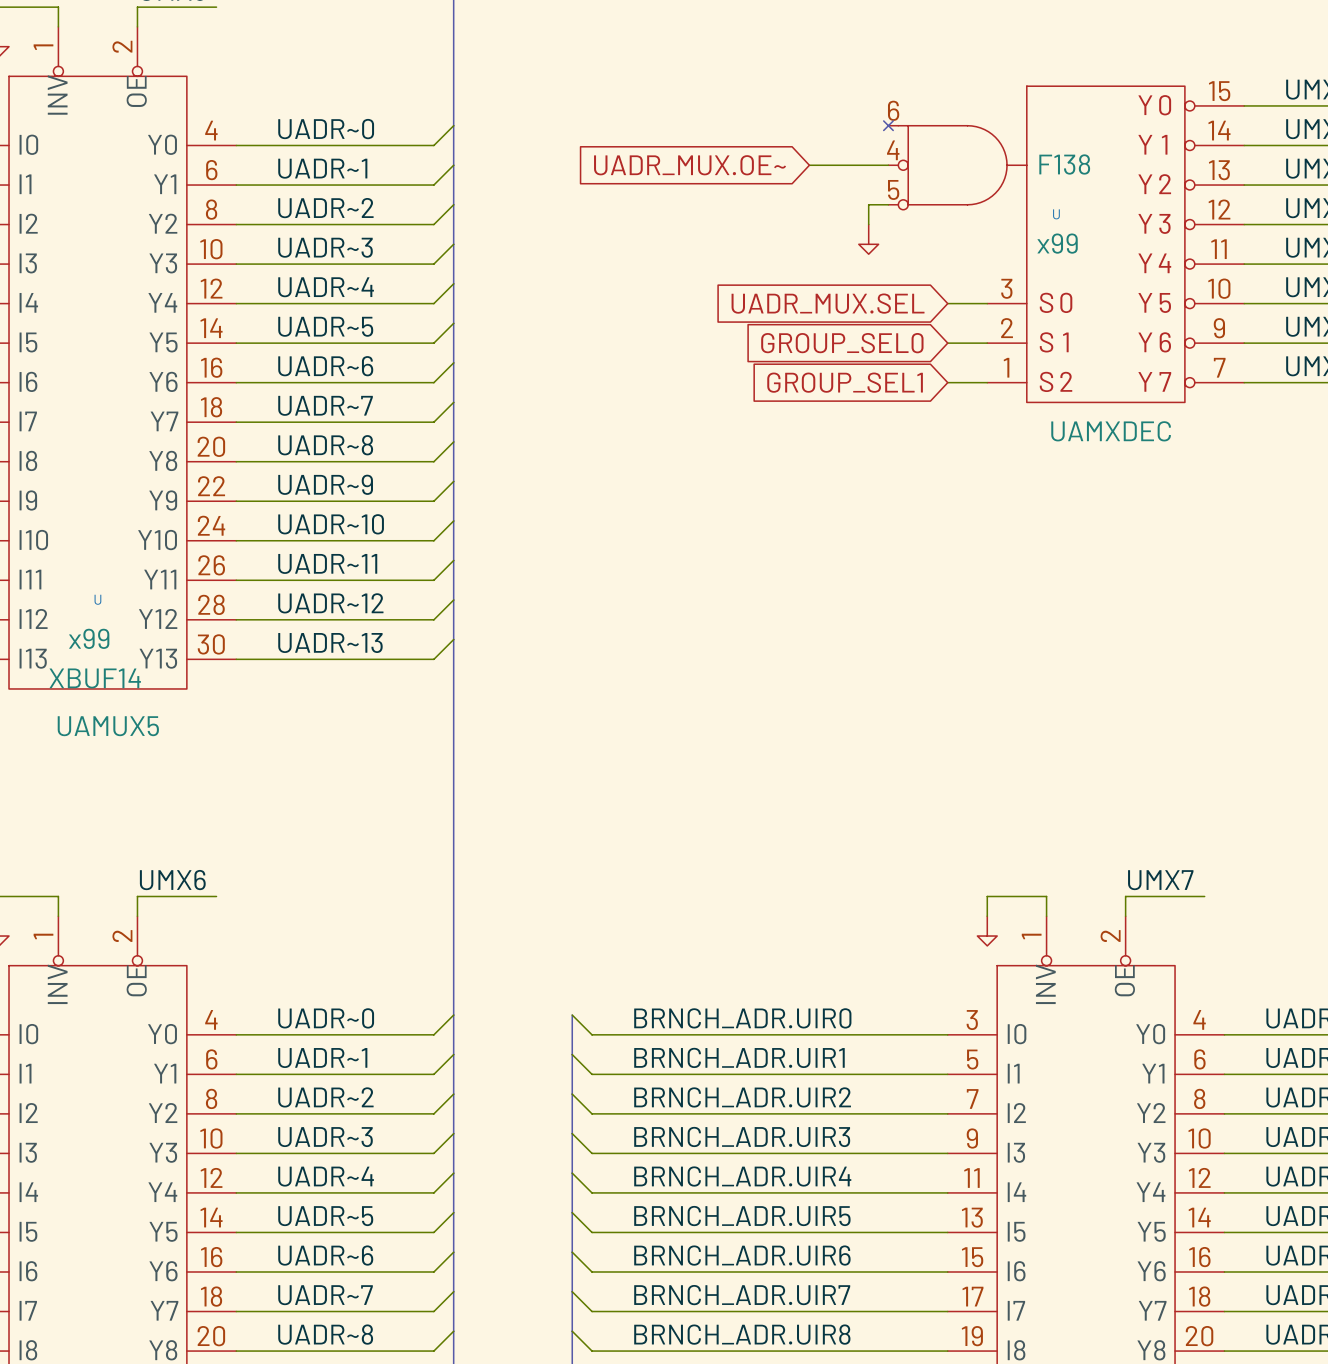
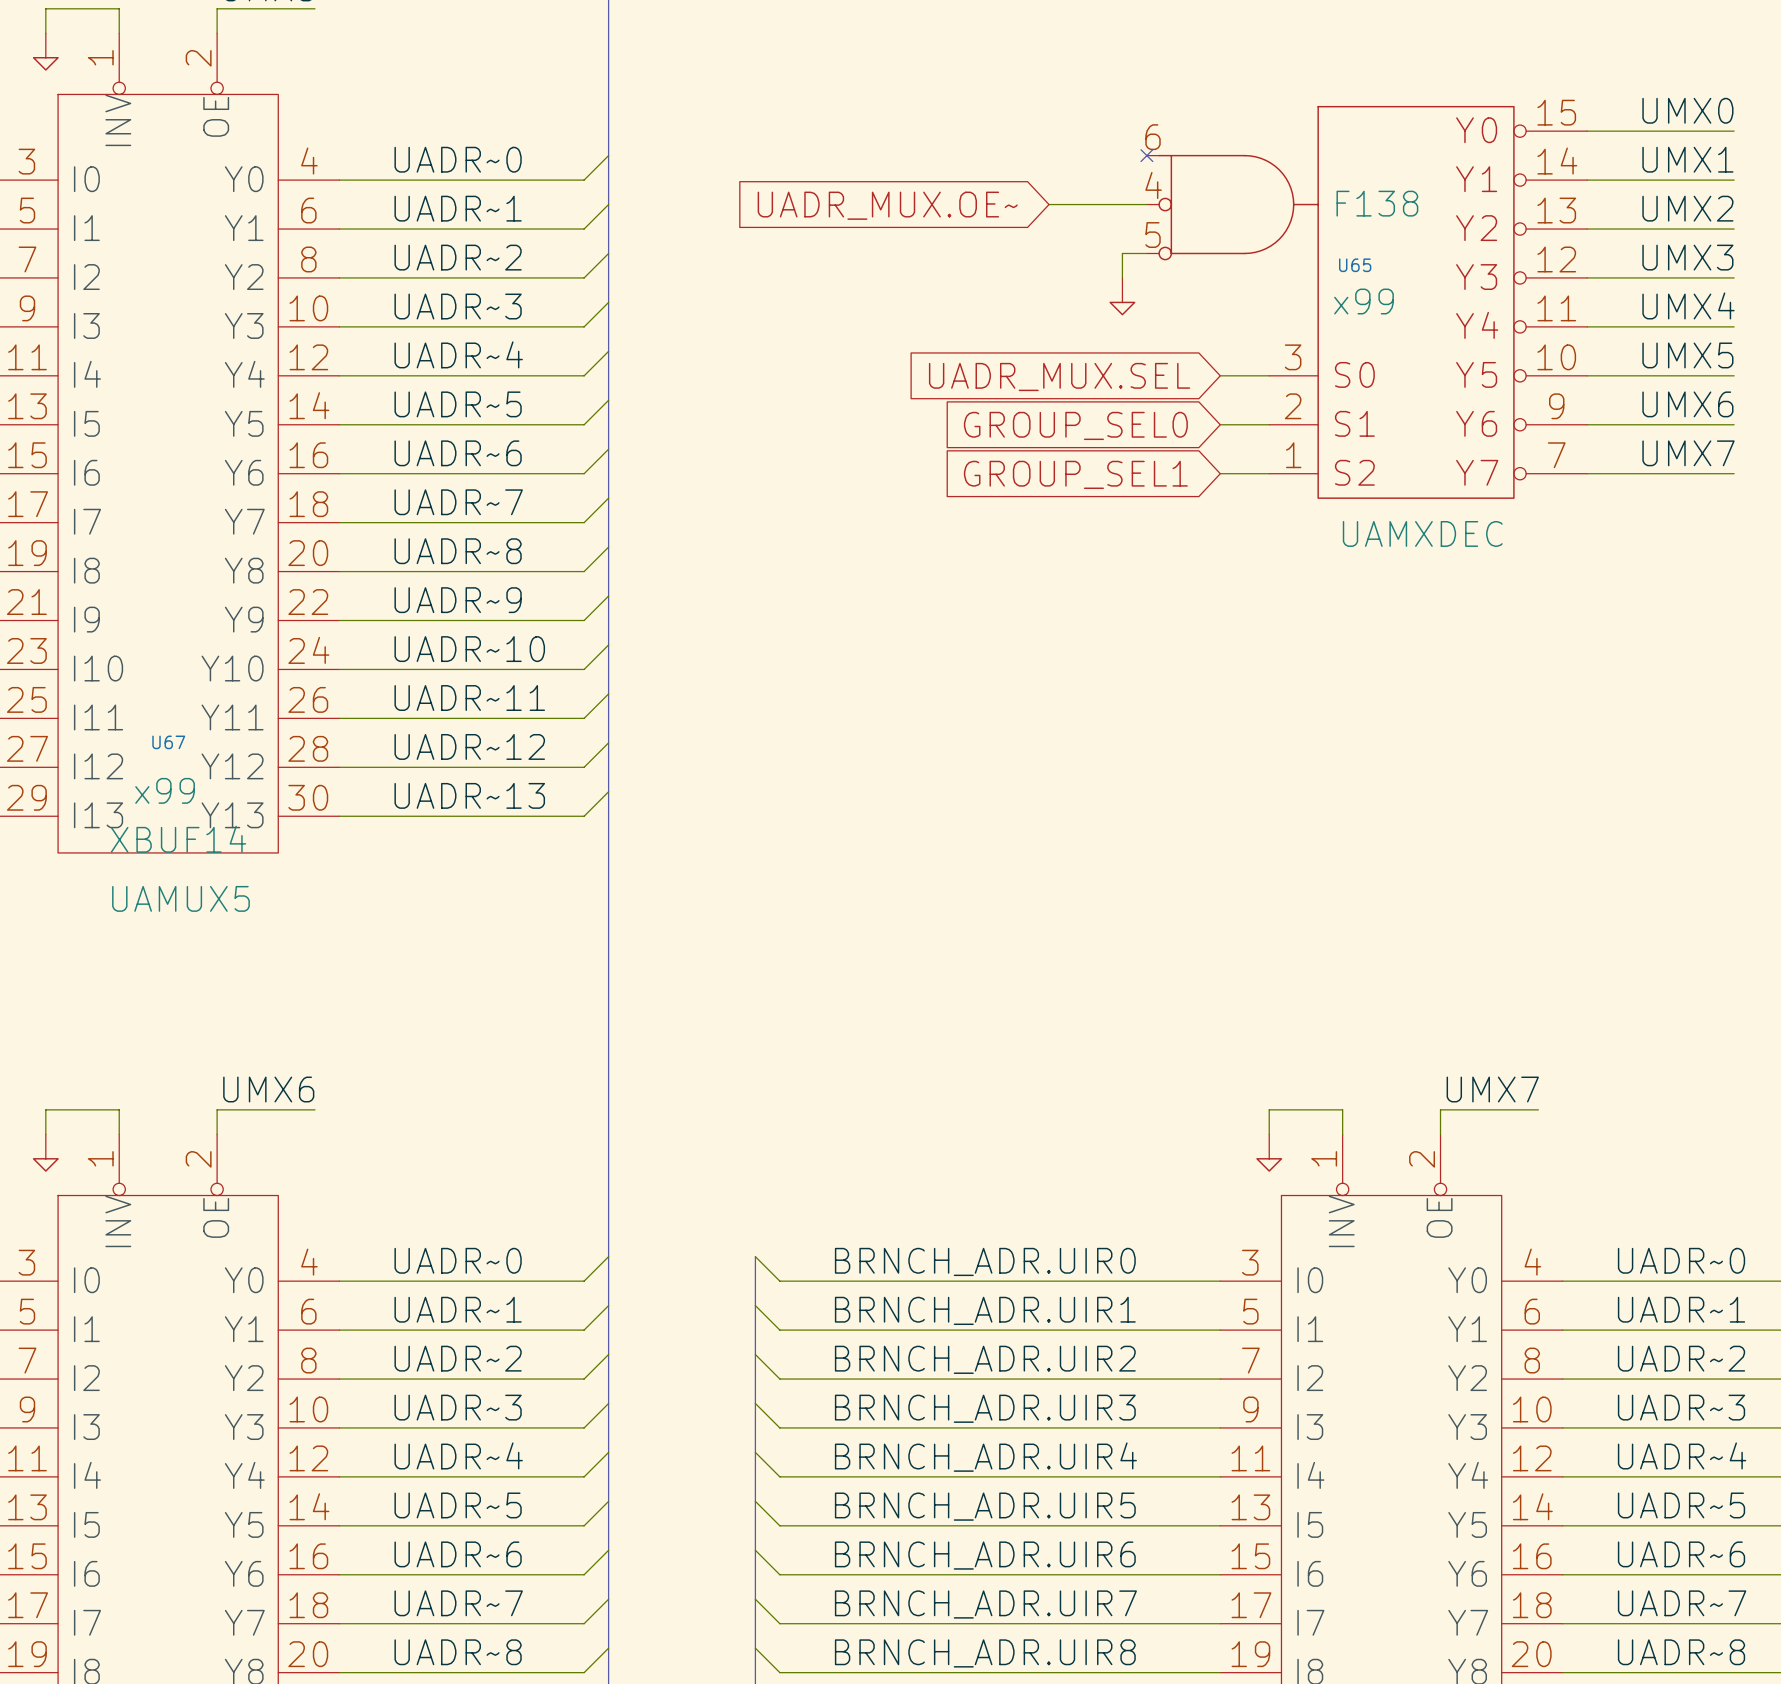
U name: U (1056, 214) -> U65 (1355, 265)
U name: U (97, 599) -> U67 (168, 742)

